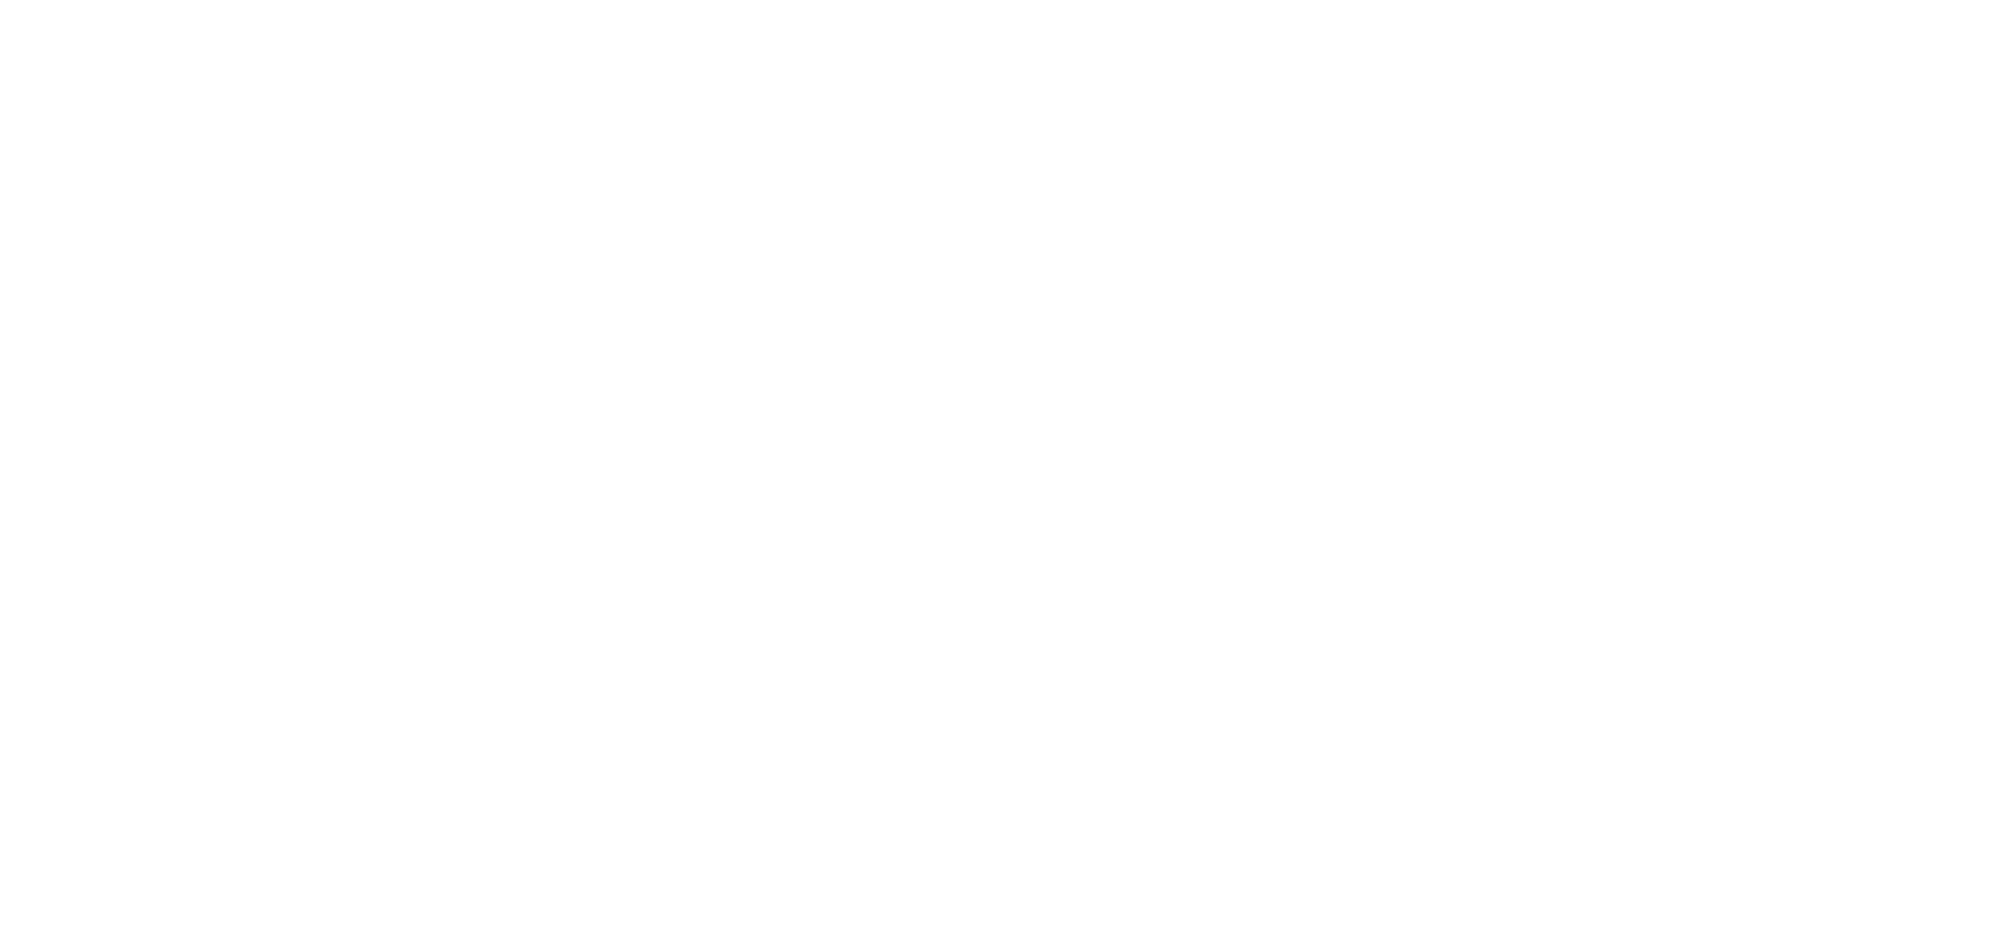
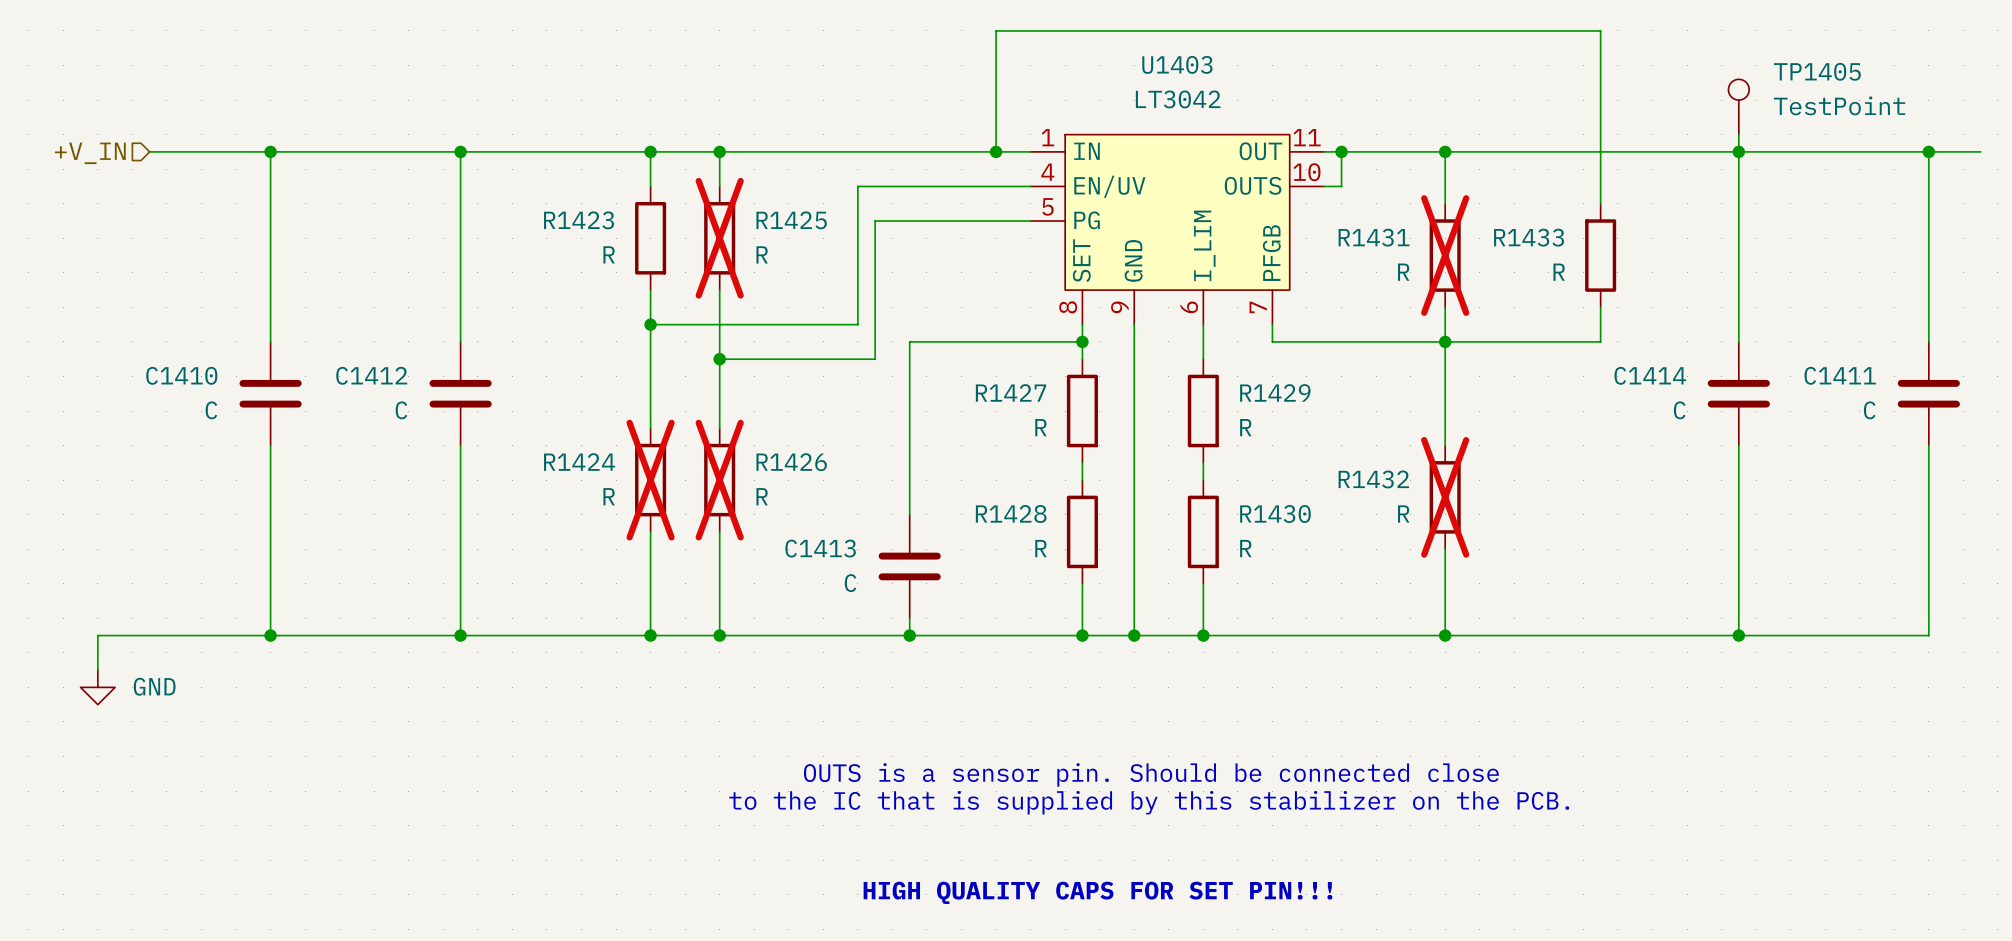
TP1405: none -> TestPoint (1738, 106)
wire: none -> (1738, 134) (1738, 341)
wire: none -> (149, 151) (1030, 151)
wire: none -> (270, 151) (270, 341)
junction: none -> (270, 151)
wire: none -> (460, 151) (460, 341)
junction: none -> (460, 151)
wire: none -> (650, 151) (650, 186)
junction: none -> (650, 151)
wire: none -> (719, 151) (719, 186)
junction: none -> (719, 151)
wire: none -> (996, 151) (996, 30) (1600, 30) (1600, 203)
junction: none -> (996, 151)
wire: none -> (1324, 151) (1980, 151)
wire: none -> (1341, 151) (1341, 186) (1324, 186)
junction: none -> (1341, 151)
wire: none -> (1445, 151) (1445, 203)
junction: none -> (1445, 151)
junction: none -> (1738, 151)
wire: none -> (1928, 151) (1928, 341)
junction: none -> (1928, 151)
hierarchical label: none -> +V_IN (90, 153)
wire: none -> (1030, 186) (857, 186) (857, 324) (650, 324)
wire: none -> (1030, 221) (875, 221) (875, 359) (719, 359)
U1403: none -> LT3042 (1177, 229)
R1423: none -> R (650, 238)
R1425: none -> R (719, 238)
R1431: none -> R (1445, 255)
R1433: none -> R (1600, 255)
wire: none -> (650, 290) (650, 428)
wire: none -> (719, 290) (719, 428)
wire: none -> (1445, 307) (1445, 445)
wire: none -> (1600, 307) (1600, 341) (1272, 341) (1272, 324)
junction: none -> (650, 324)
wire: none -> (1082, 324) (1082, 359)
wire: none -> (1134, 324) (1134, 635)
wire: none -> (1203, 324) (1203, 359)
wire: none -> (1082, 341) (909, 341) (909, 514)
junction: none -> (1082, 341)
junction: none -> (1445, 341)
junction: none -> (719, 359)
C1410: none -> C (270, 393)
C1412: none -> C (460, 393)
C1414: none -> C (1738, 393)
C1411: none -> C (1928, 393)
R1427: none -> R (1082, 411)
R1429: none -> R (1203, 411)
wire: none -> (270, 445) (270, 635)
wire: none -> (460, 445) (460, 635)
wire: none -> (1738, 445) (1738, 635)
wire: none -> (1928, 445) (1928, 635) (97, 635) (97, 670)
wire: none -> (1082, 462) (1082, 480)
wire: none -> (1203, 462) (1203, 480)
R1424: none -> R (650, 480)
R1426: none -> R (719, 480)
R1432: none -> R (1445, 497)
wire: none -> (650, 531) (650, 635)
wire: none -> (719, 531) (719, 635)
R1428: none -> R (1082, 531)
R1430: none -> R (1203, 531)
wire: none -> (1445, 549) (1445, 635)
C1413: none -> C (909, 566)
wire: none -> (1082, 583) (1082, 635)
wire: none -> (1203, 583) (1203, 635)
wire: none -> (909, 618) (909, 635)
junction: none -> (270, 635)
junction: none -> (460, 635)
junction: none -> (650, 635)
junction: none -> (719, 635)
junction: none -> (909, 635)
junction: none -> (1082, 635)
junction: none -> (1134, 635)
junction: none -> (1203, 635)
junction: none -> (1445, 635)
junction: none -> (1738, 635)
power symbol: none -> GND (97, 687)
text: none -> OUTS is a sensor pin. Should be connected close (1151, 774)
text: none -> to the IC that is supplied by this stabilizer on the PCB. (1149, 802)
text: none -> HIGH QUALITY CAPS FOR SET PIN!!! (1097, 892)

